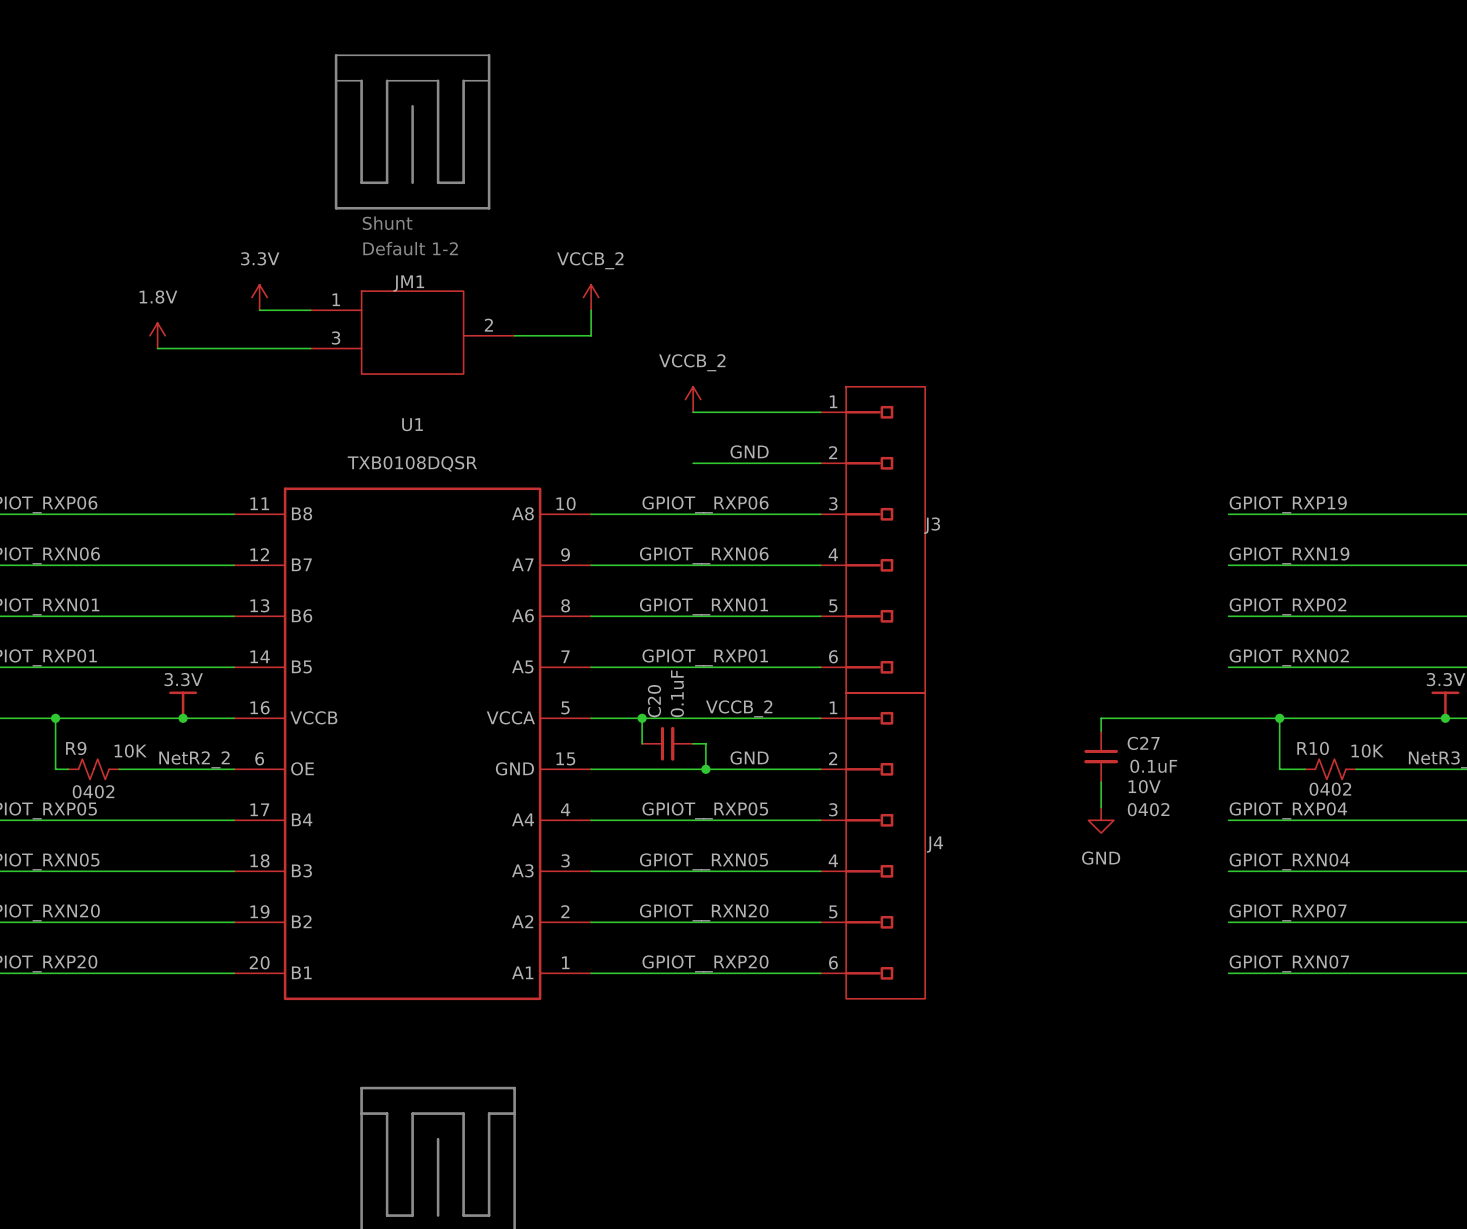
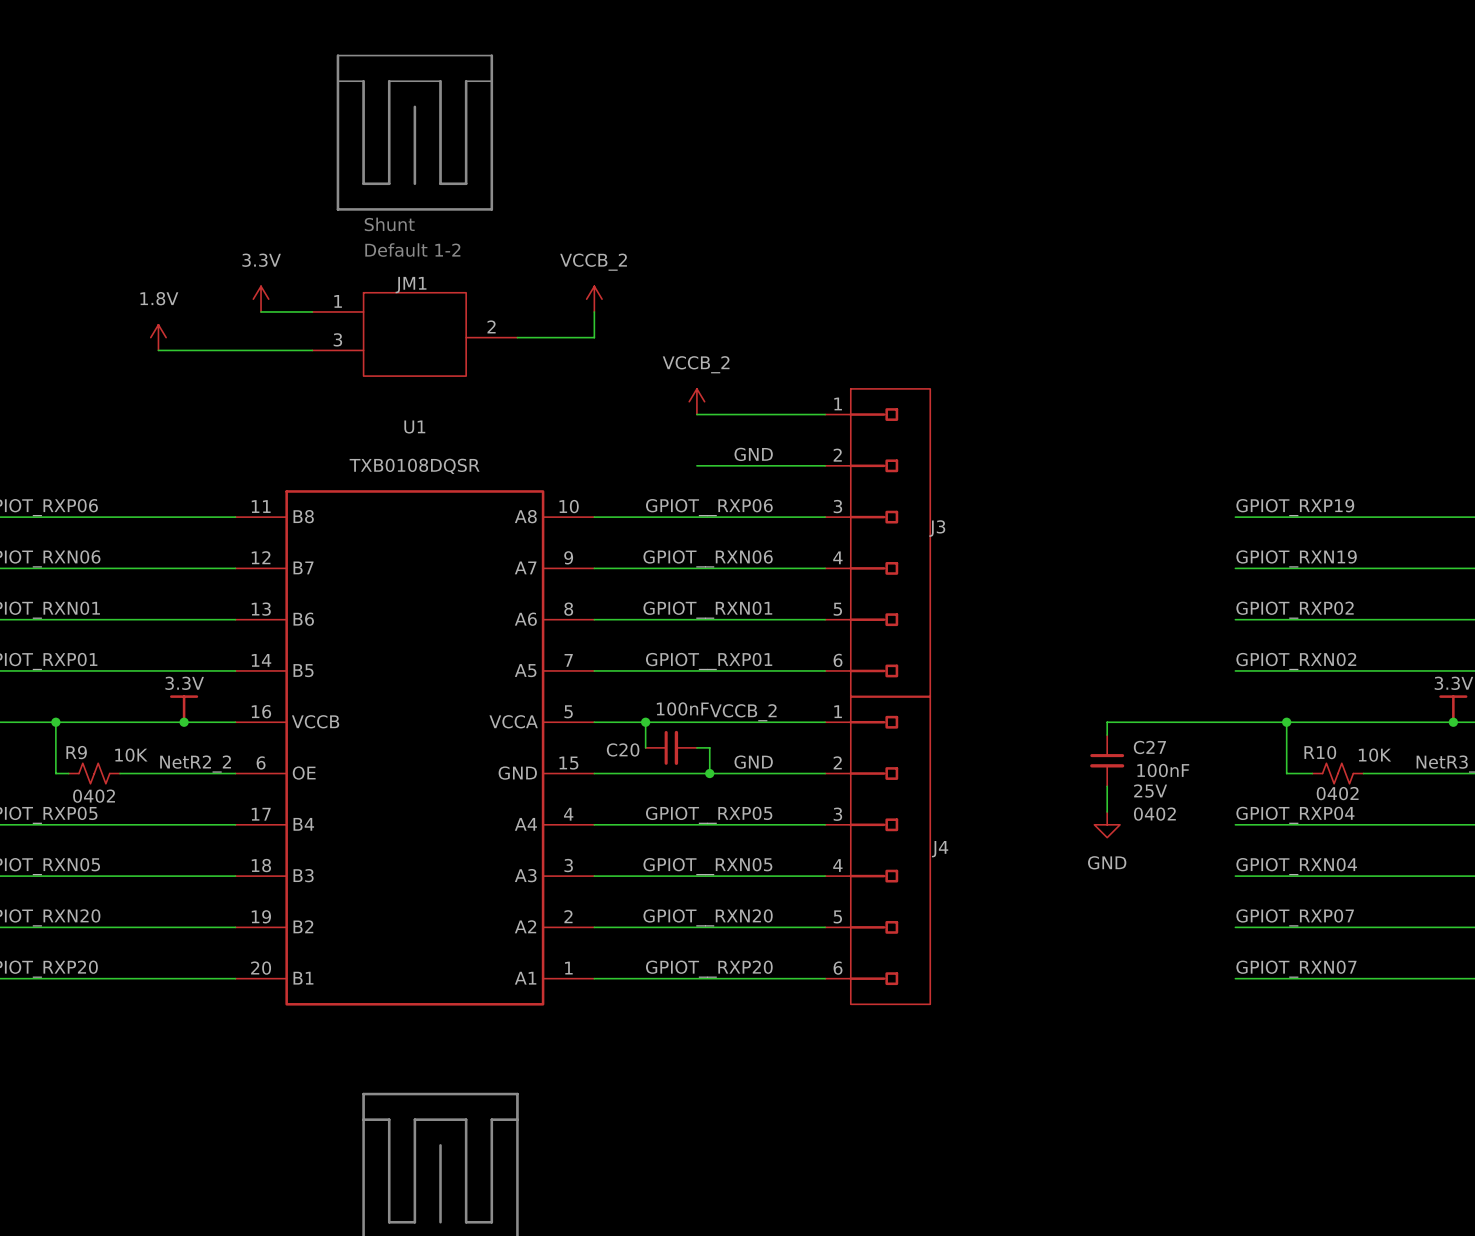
C20 value: 0.1uF (677, 693) -> 100nF (682, 708)
C20 name rotation: 0° (654, 701) -> 90° clockwise (623, 749)
C20 name position: C20 (654, 701) -> C20 (623, 749)
C27 value: 0.1uF (1153, 766) -> 100nF (1163, 770)
C27 text: 10V (1144, 786) -> 25V (1150, 791)

